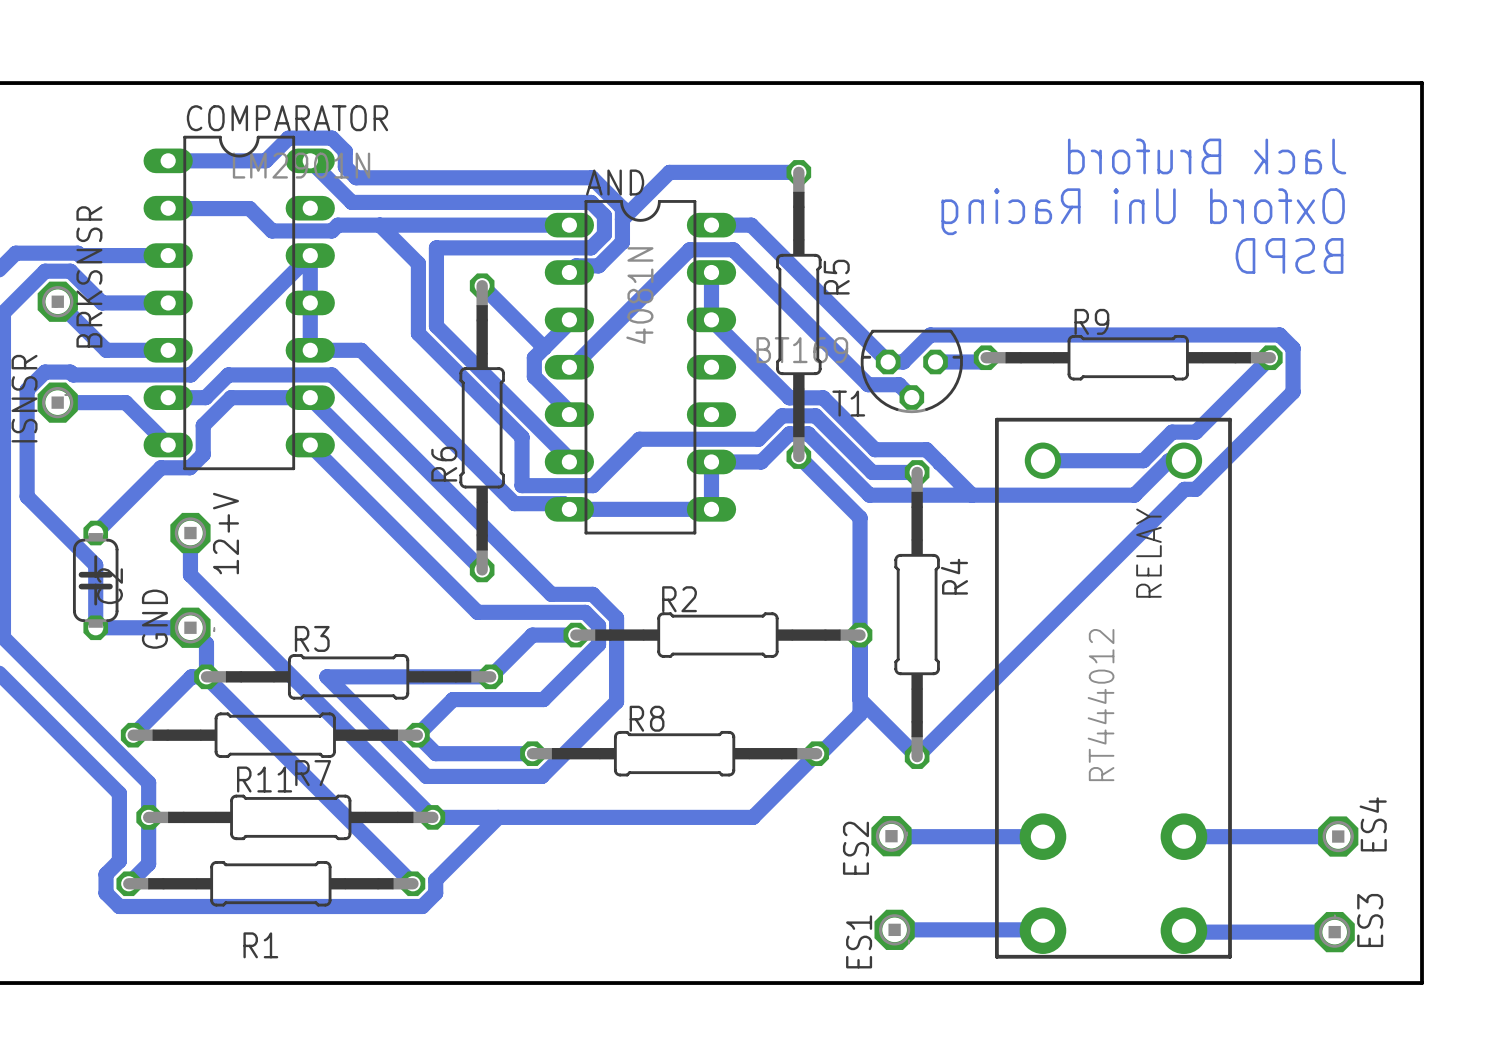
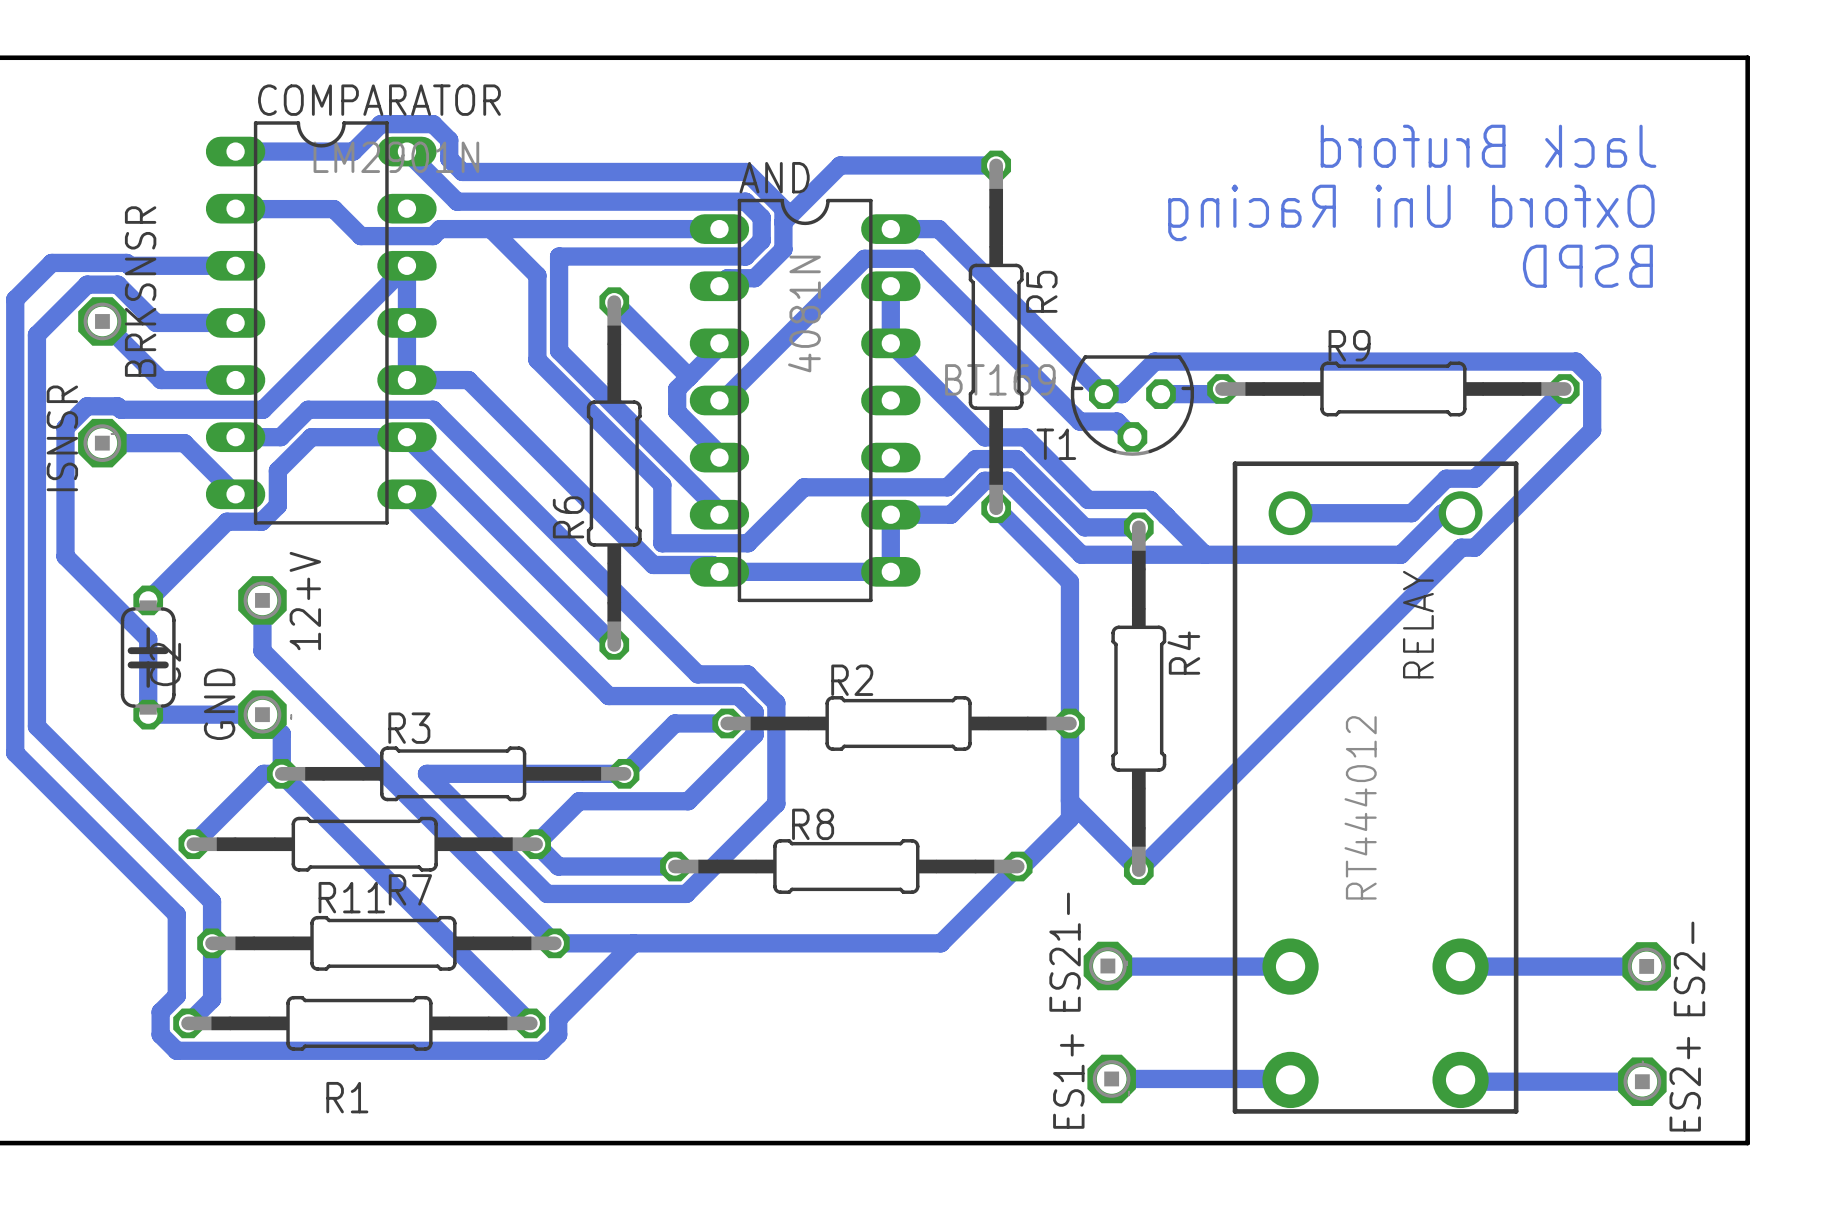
ES4 name: ES4 (1373, 824) -> ES2- (1689, 968)
ES2 name: ES2 (855, 848) -> ES21- (1065, 952)
ES3 name: ES3 (1370, 920) -> ES2+ (1685, 1084)
ES1 name: ES1 (859, 941) -> ES1+ (1068, 1081)

